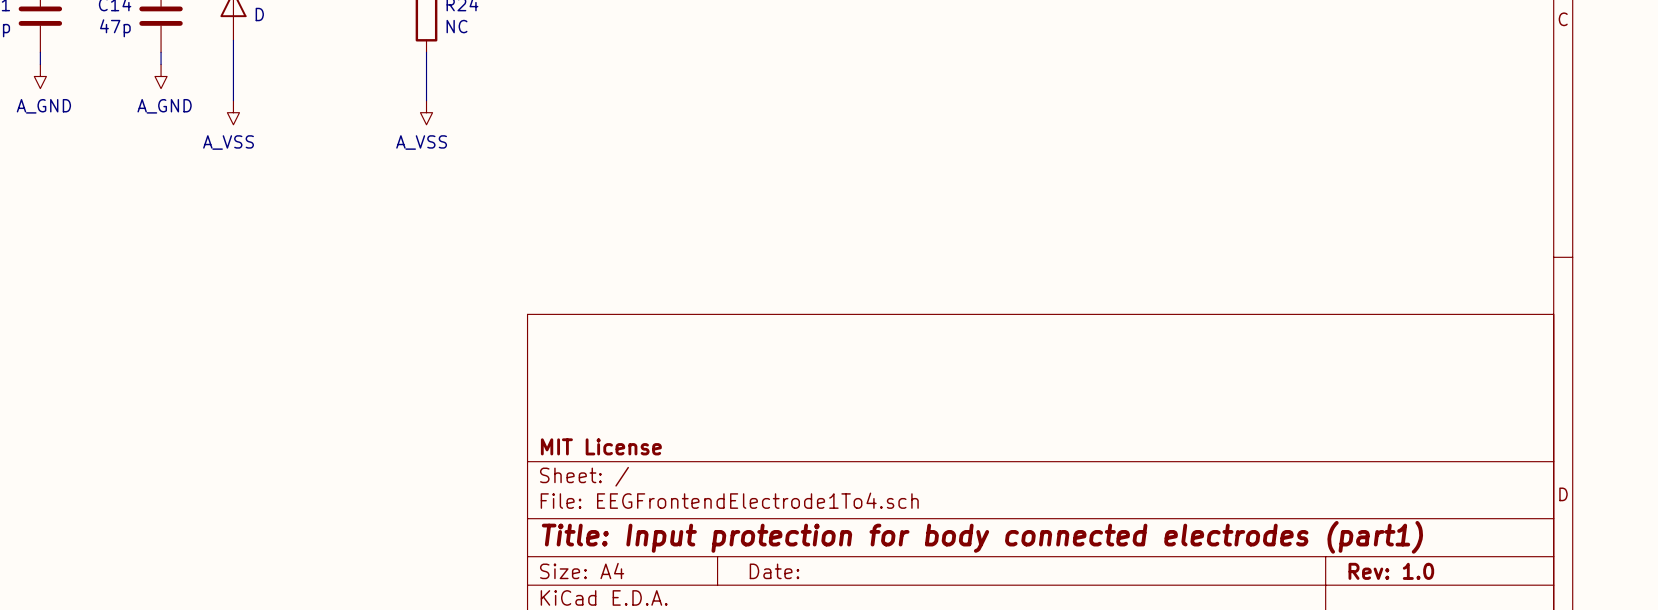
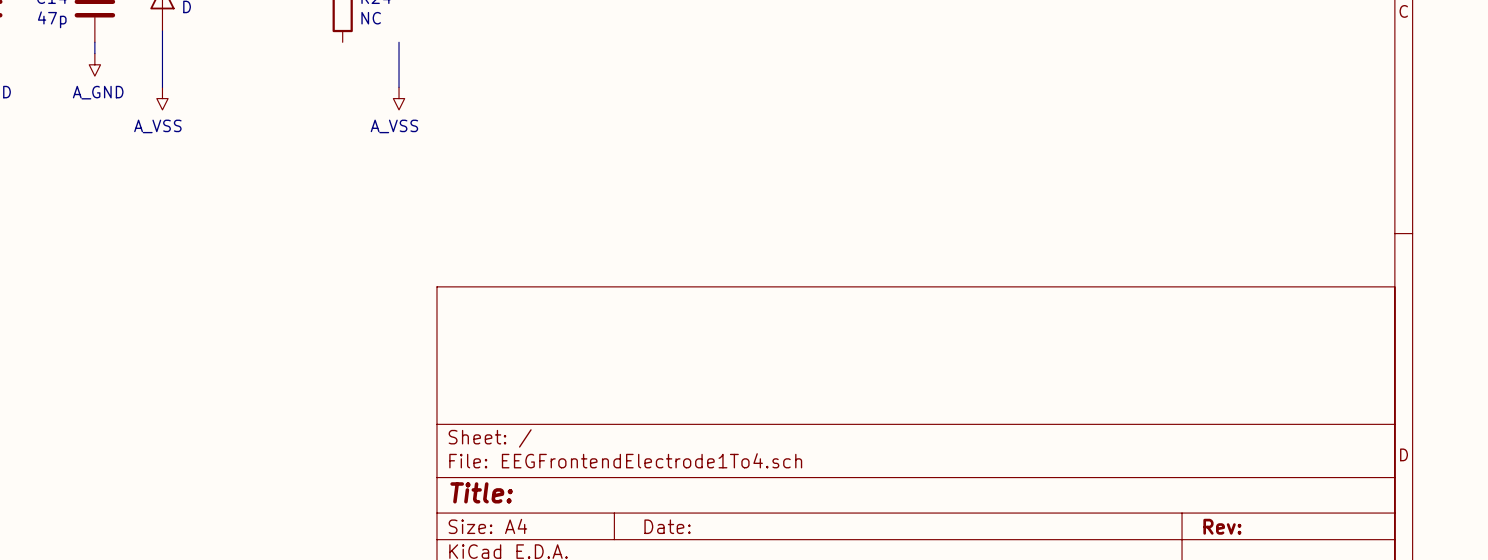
wire: (426, 52) (426, 100) -> (399, 42) (399, 87)
power symbol position: A_VSS (426, 112) -> A_VSS (399, 98)
title block: MIT License (601, 446) -> none
title block: Title: Input protection for body connected electrodes (part1) (982, 537) -> Title: (481, 492)
title block: Rev: 1.0 (1391, 571) -> Rev: (1222, 526)

